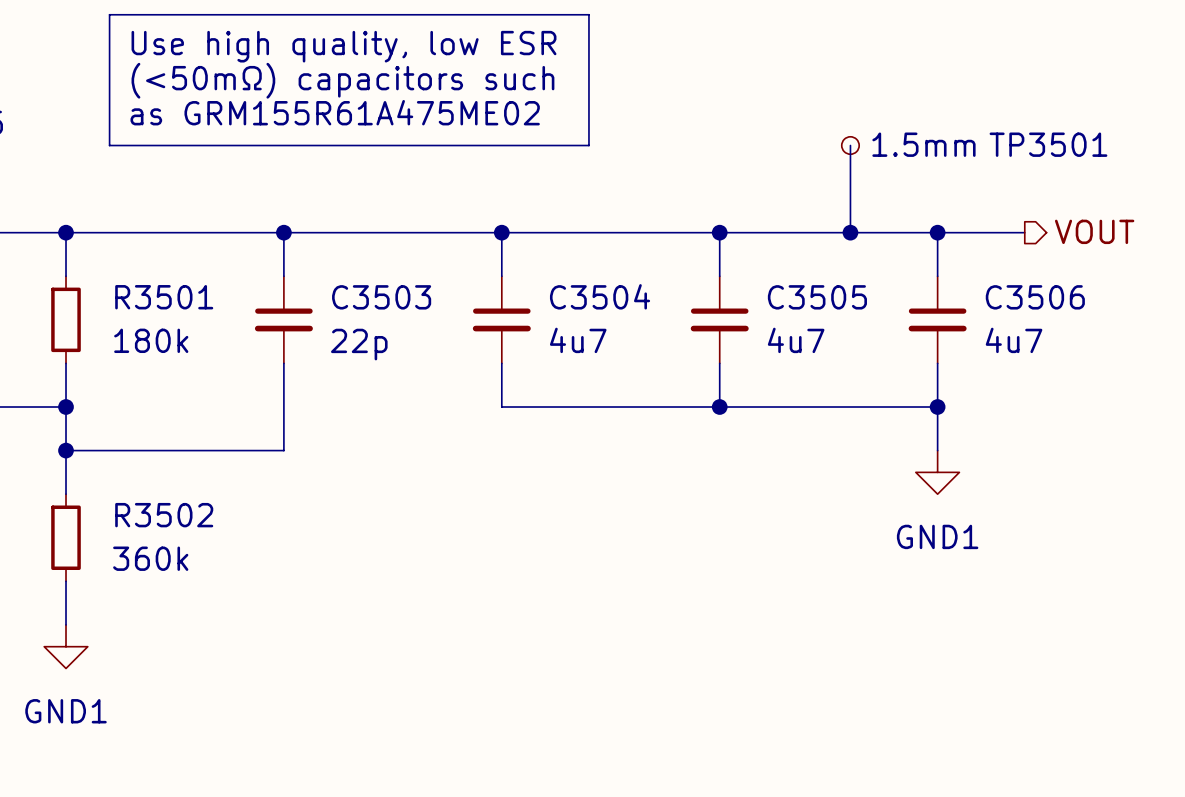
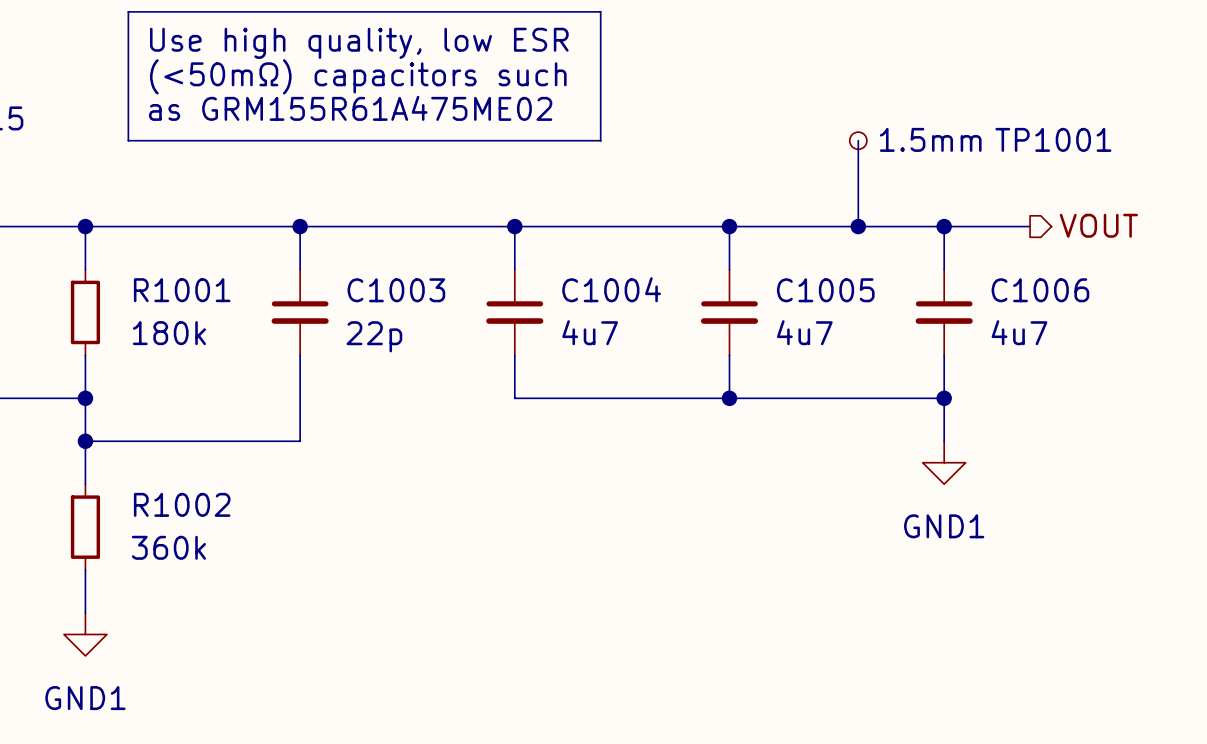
TP3501 name: TP3501 (1048, 144) -> TP1001 (1053, 139)
C3504 name: C3504 (600, 296) -> C1004 (611, 289)
R3501 name: R3501 (164, 297) -> R1001 (182, 290)
C3503 name: C3503 (381, 297) -> C1003 (396, 290)
C3505 name: C3505 (817, 297) -> C1005 (825, 290)
C3506 name: C3506 (1035, 297) -> C1006 (1040, 290)
R3502 name: R3502 (164, 515) -> R1002 (182, 504)

